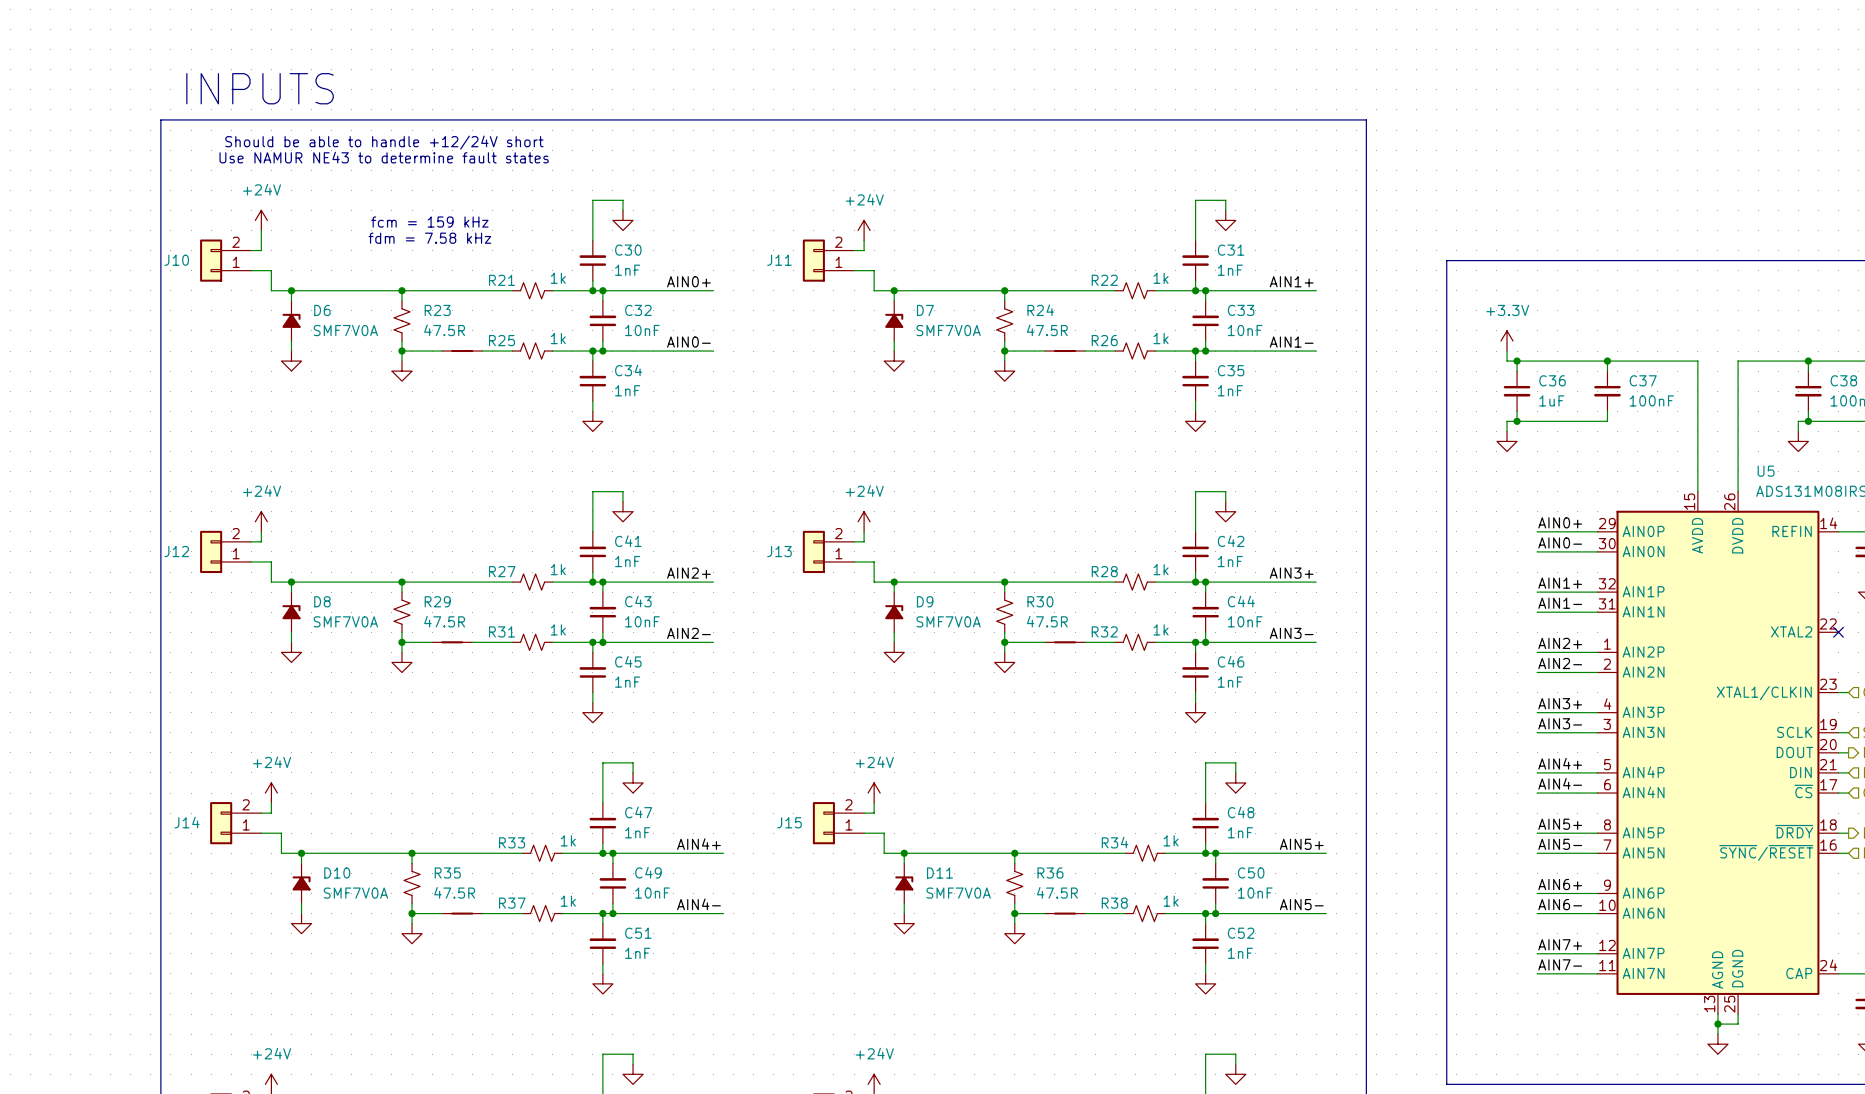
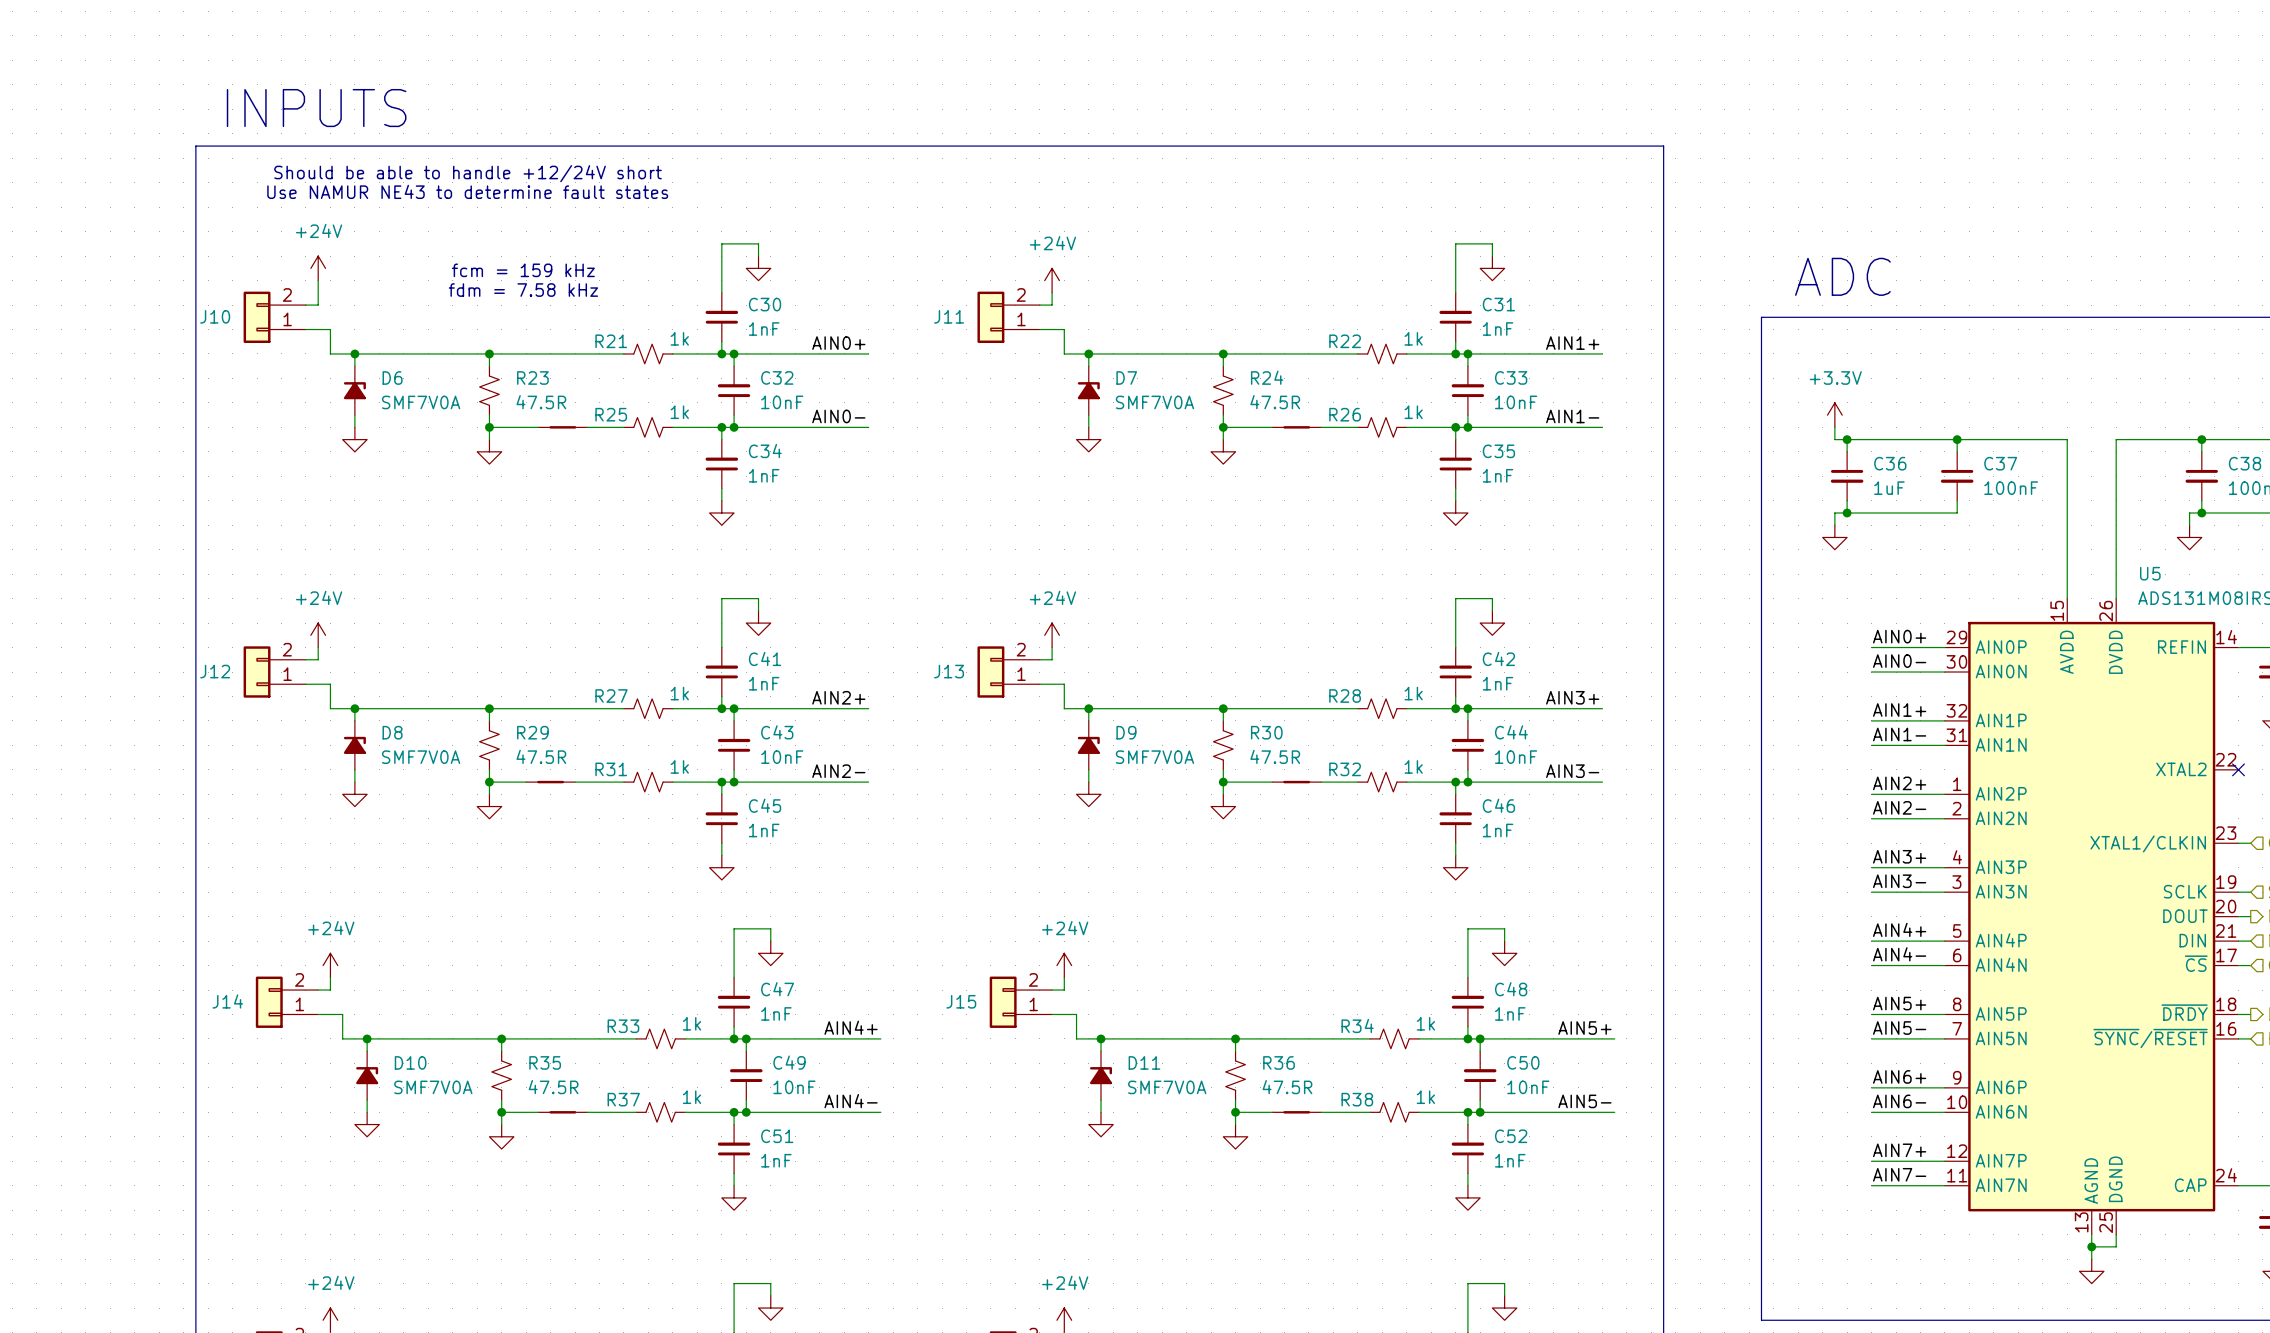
text: none -> ADC (1842, 276)

